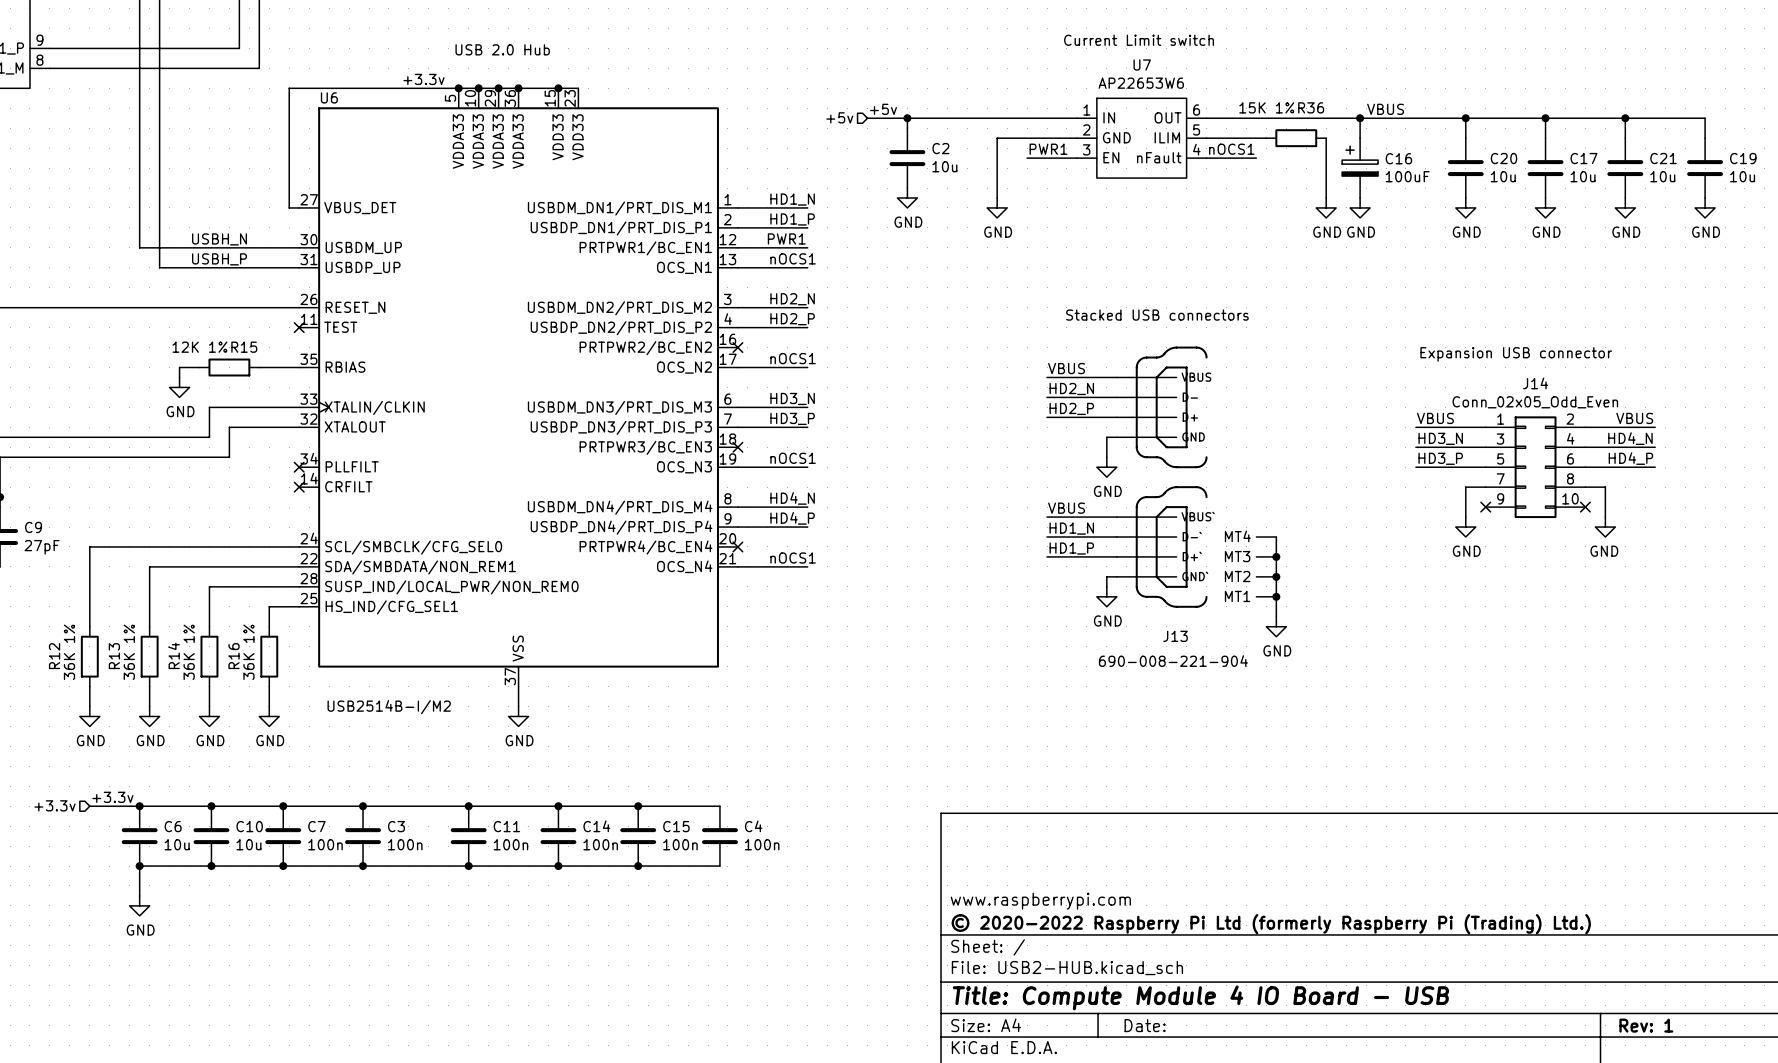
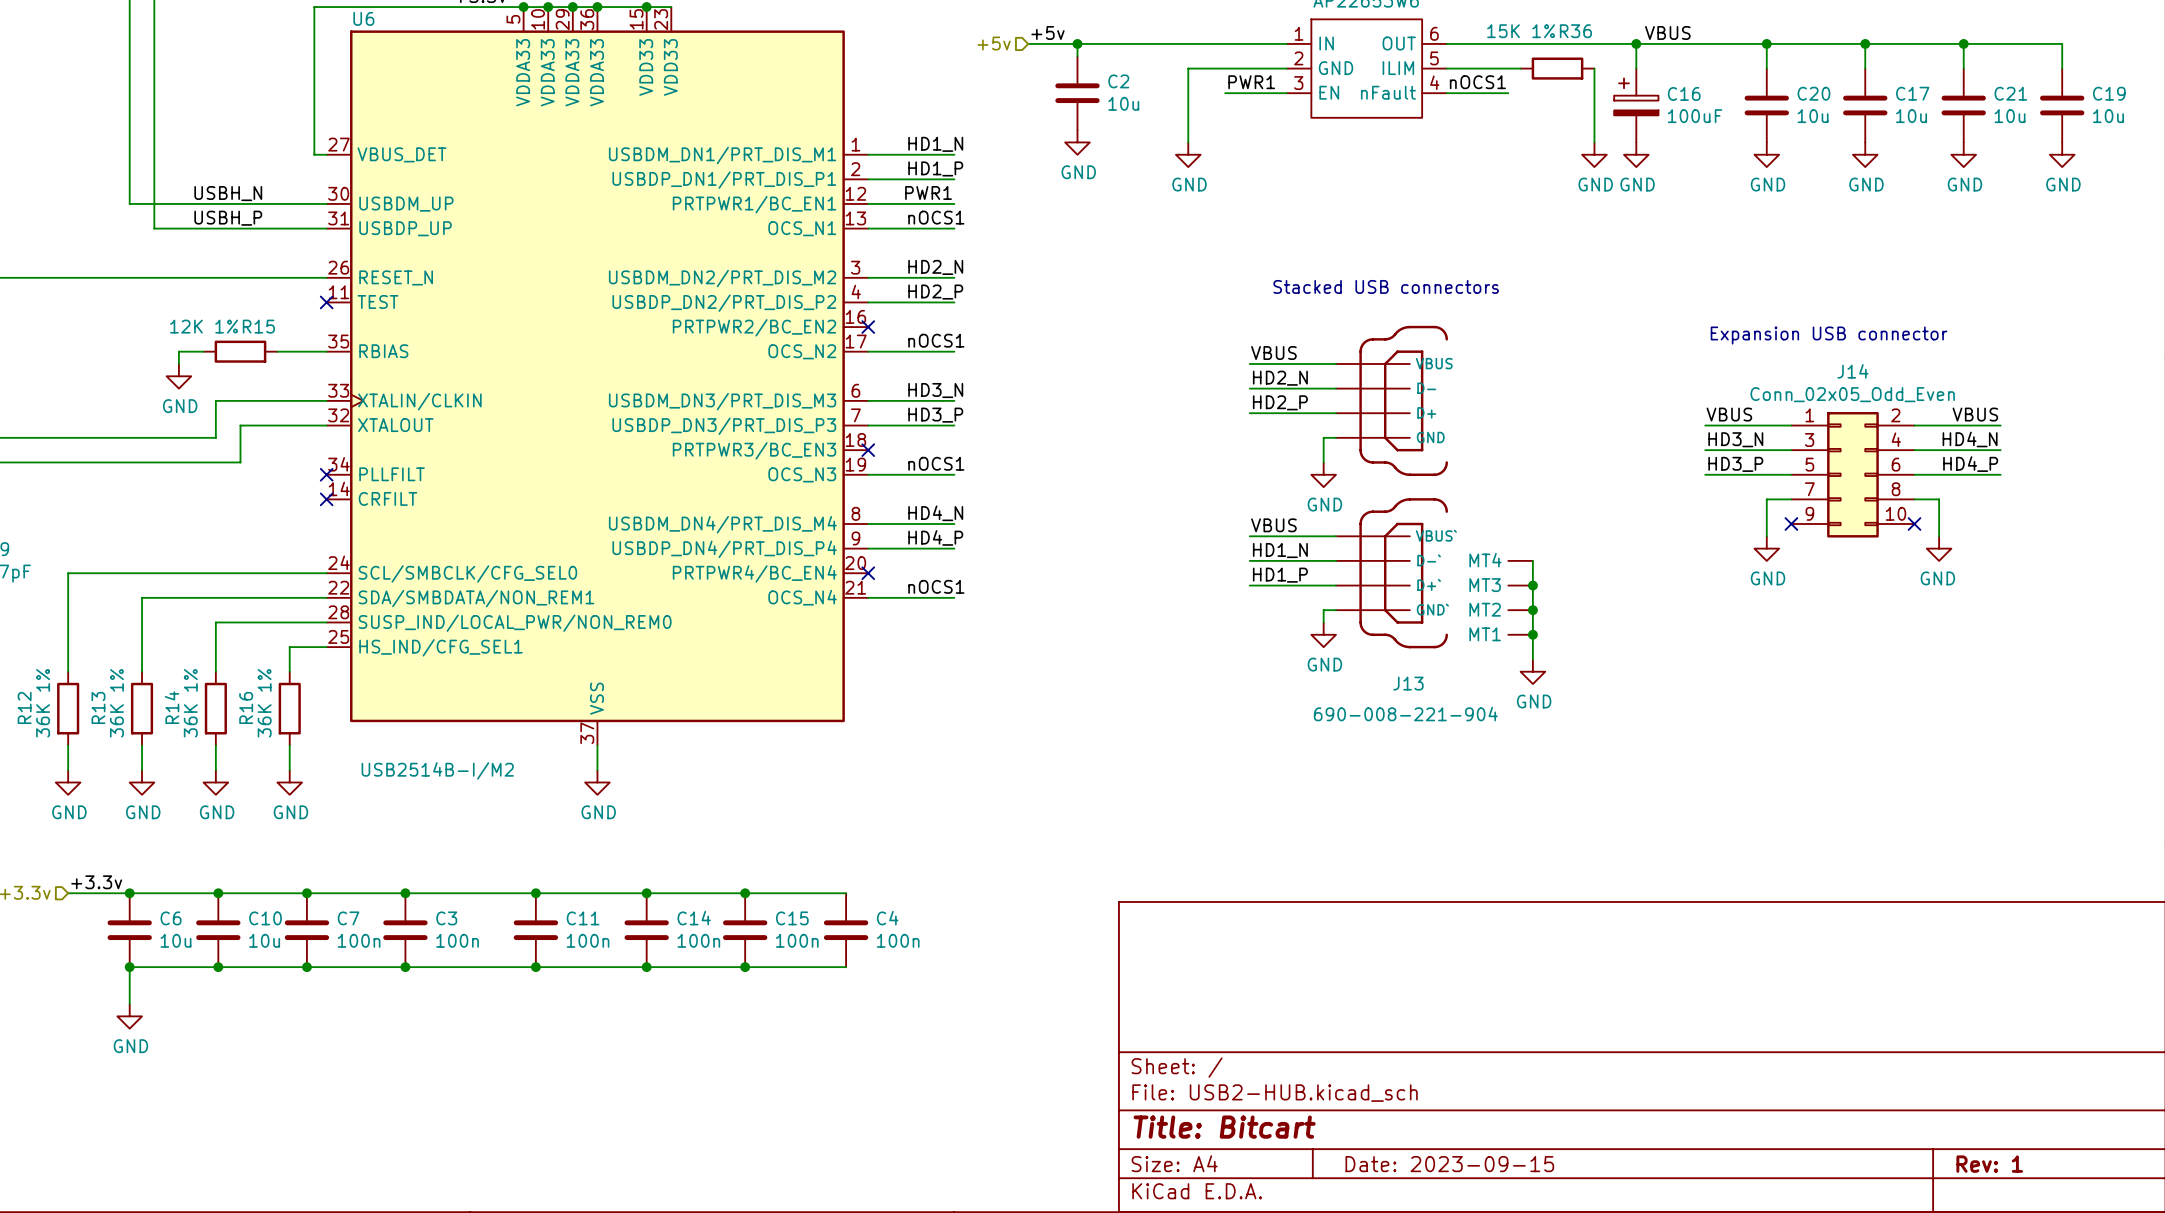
title block: www.raspberrypi.com (1040, 901) -> none
title block: © 2020-2022 Raspberry Pi Ltd (formerly Raspberry Pi (Trading) Ltd.) (1271, 924) -> none
title block: Title: Compute Module 4 IO Board - USB (1200, 997) -> Title: Bitcart (1224, 1127)
title block: Date: (1145, 1025) -> Date: 2023-09-15 (1449, 1164)

